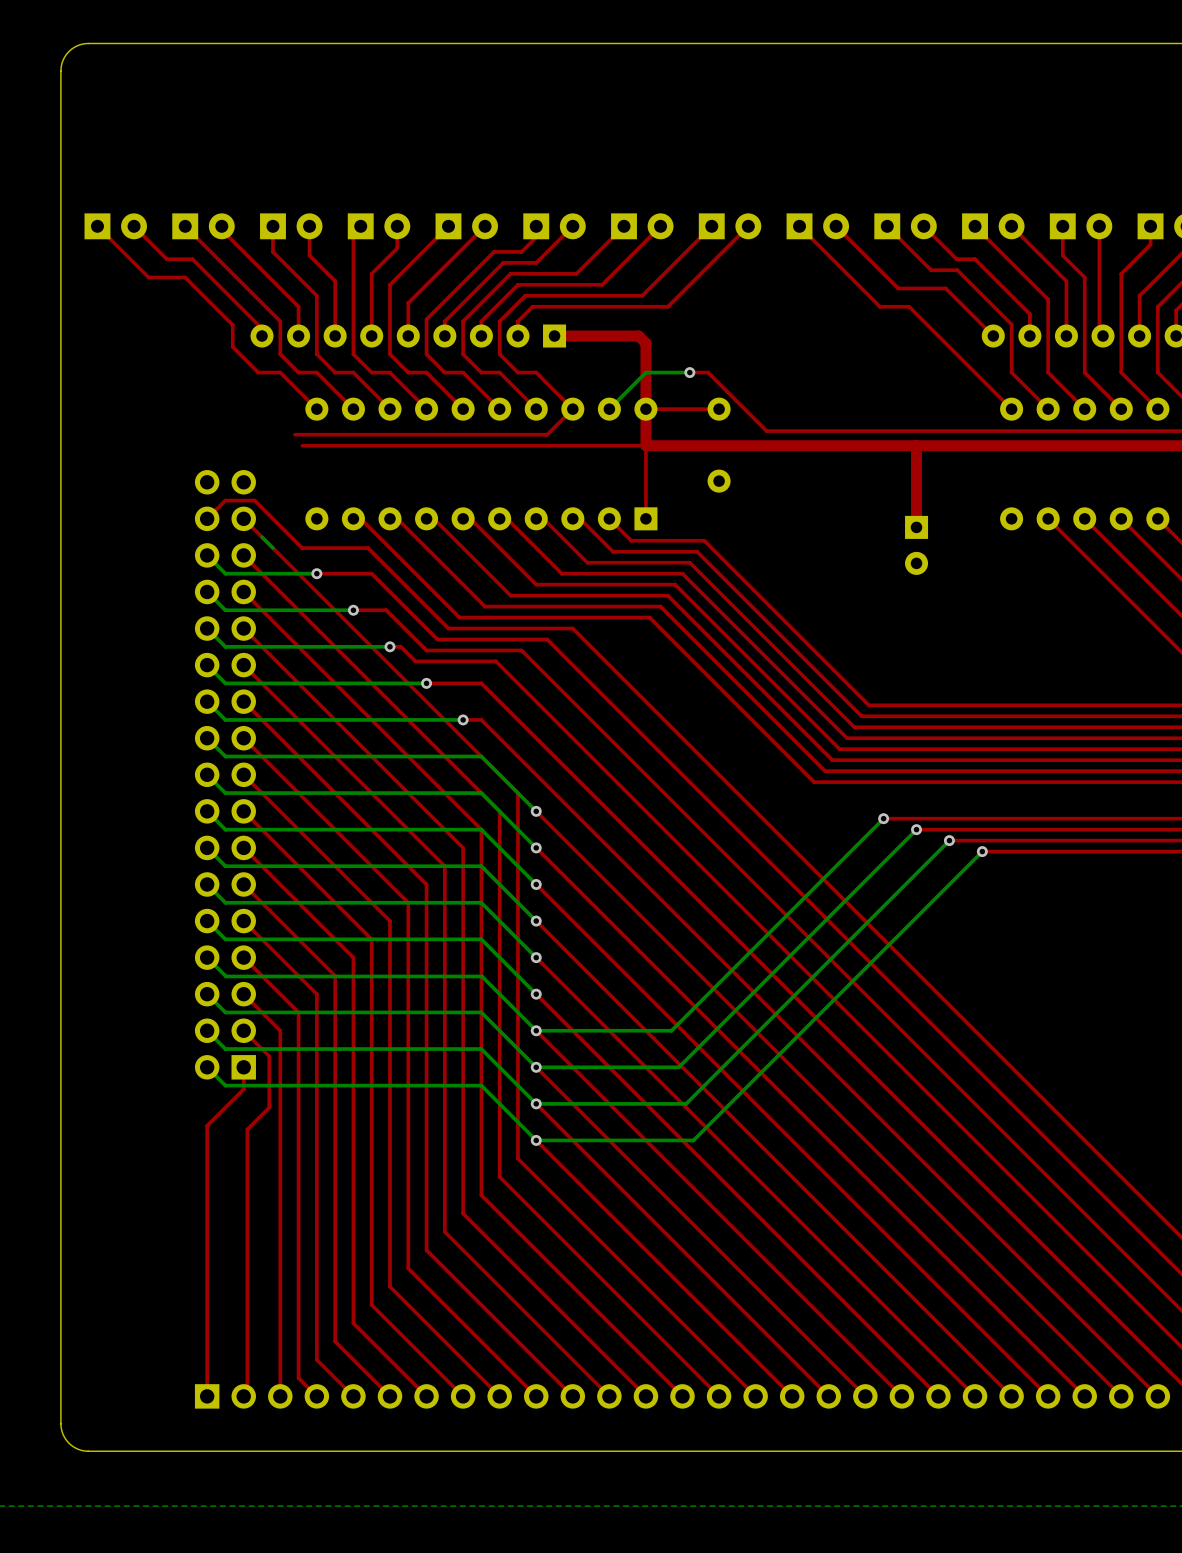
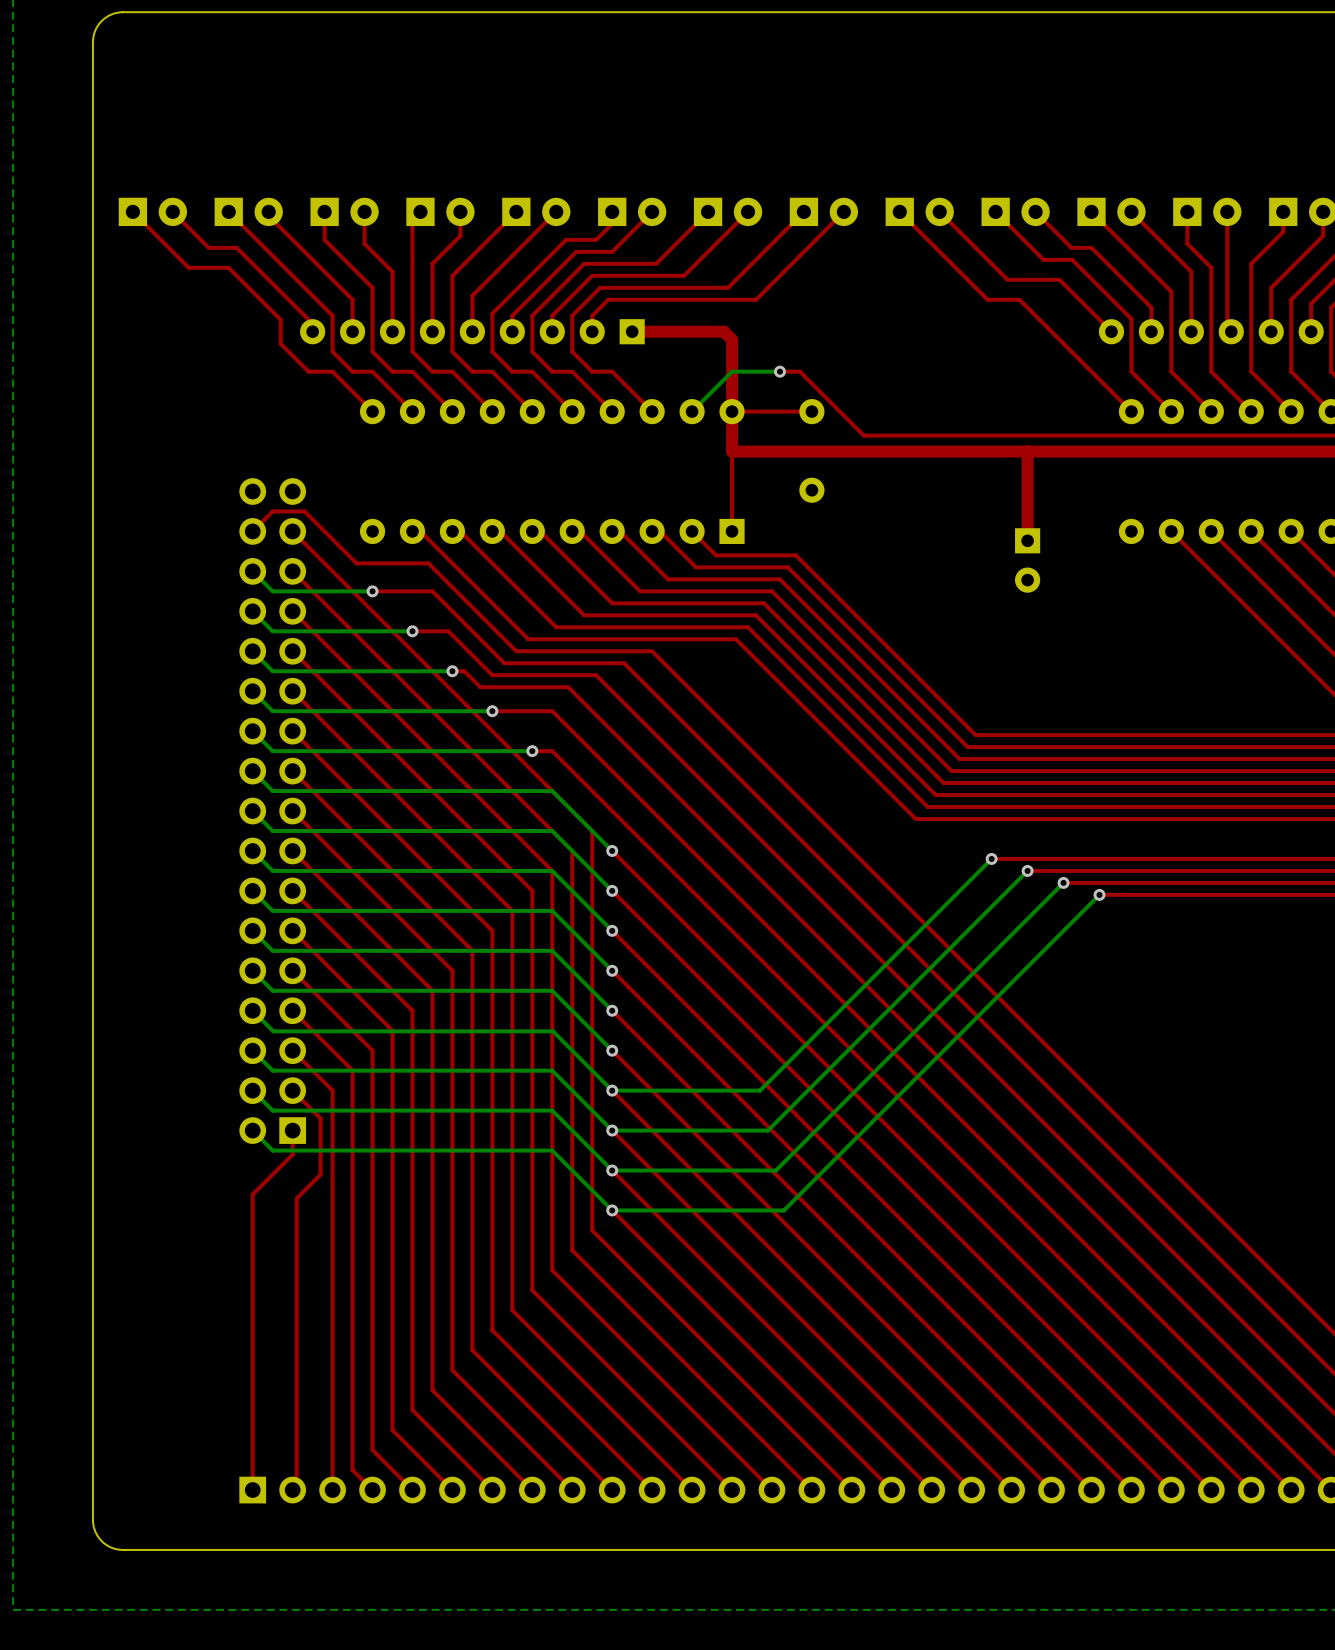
top track: (572, 409) (547, 434) (294, 434) -> none
top track: (645, 445) (302, 445) -> none
bottom track: (262, 537) (272, 548) -> none

